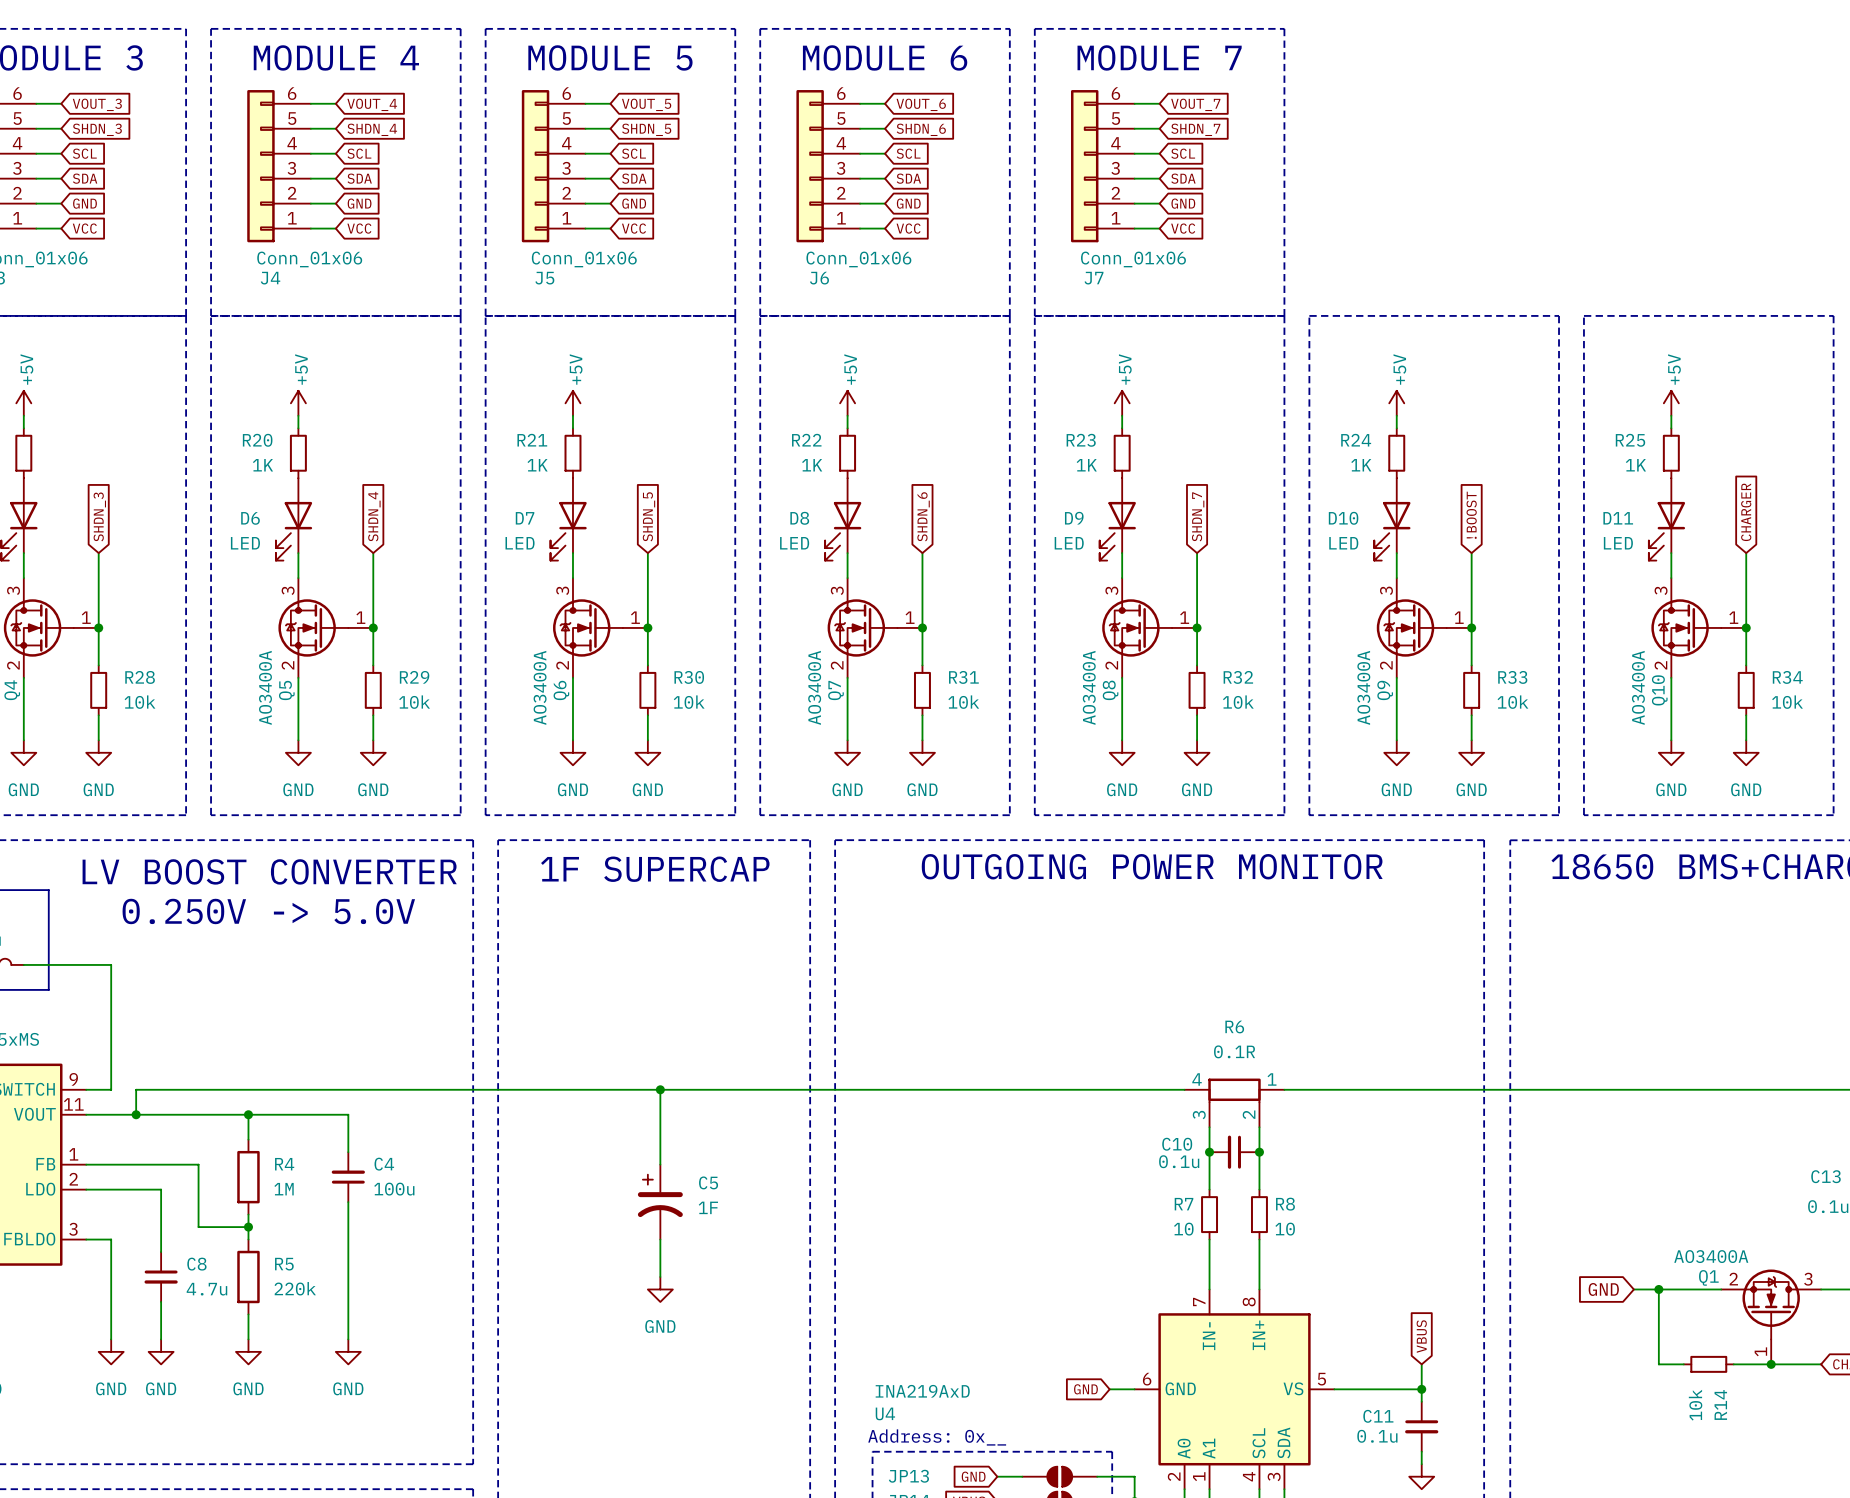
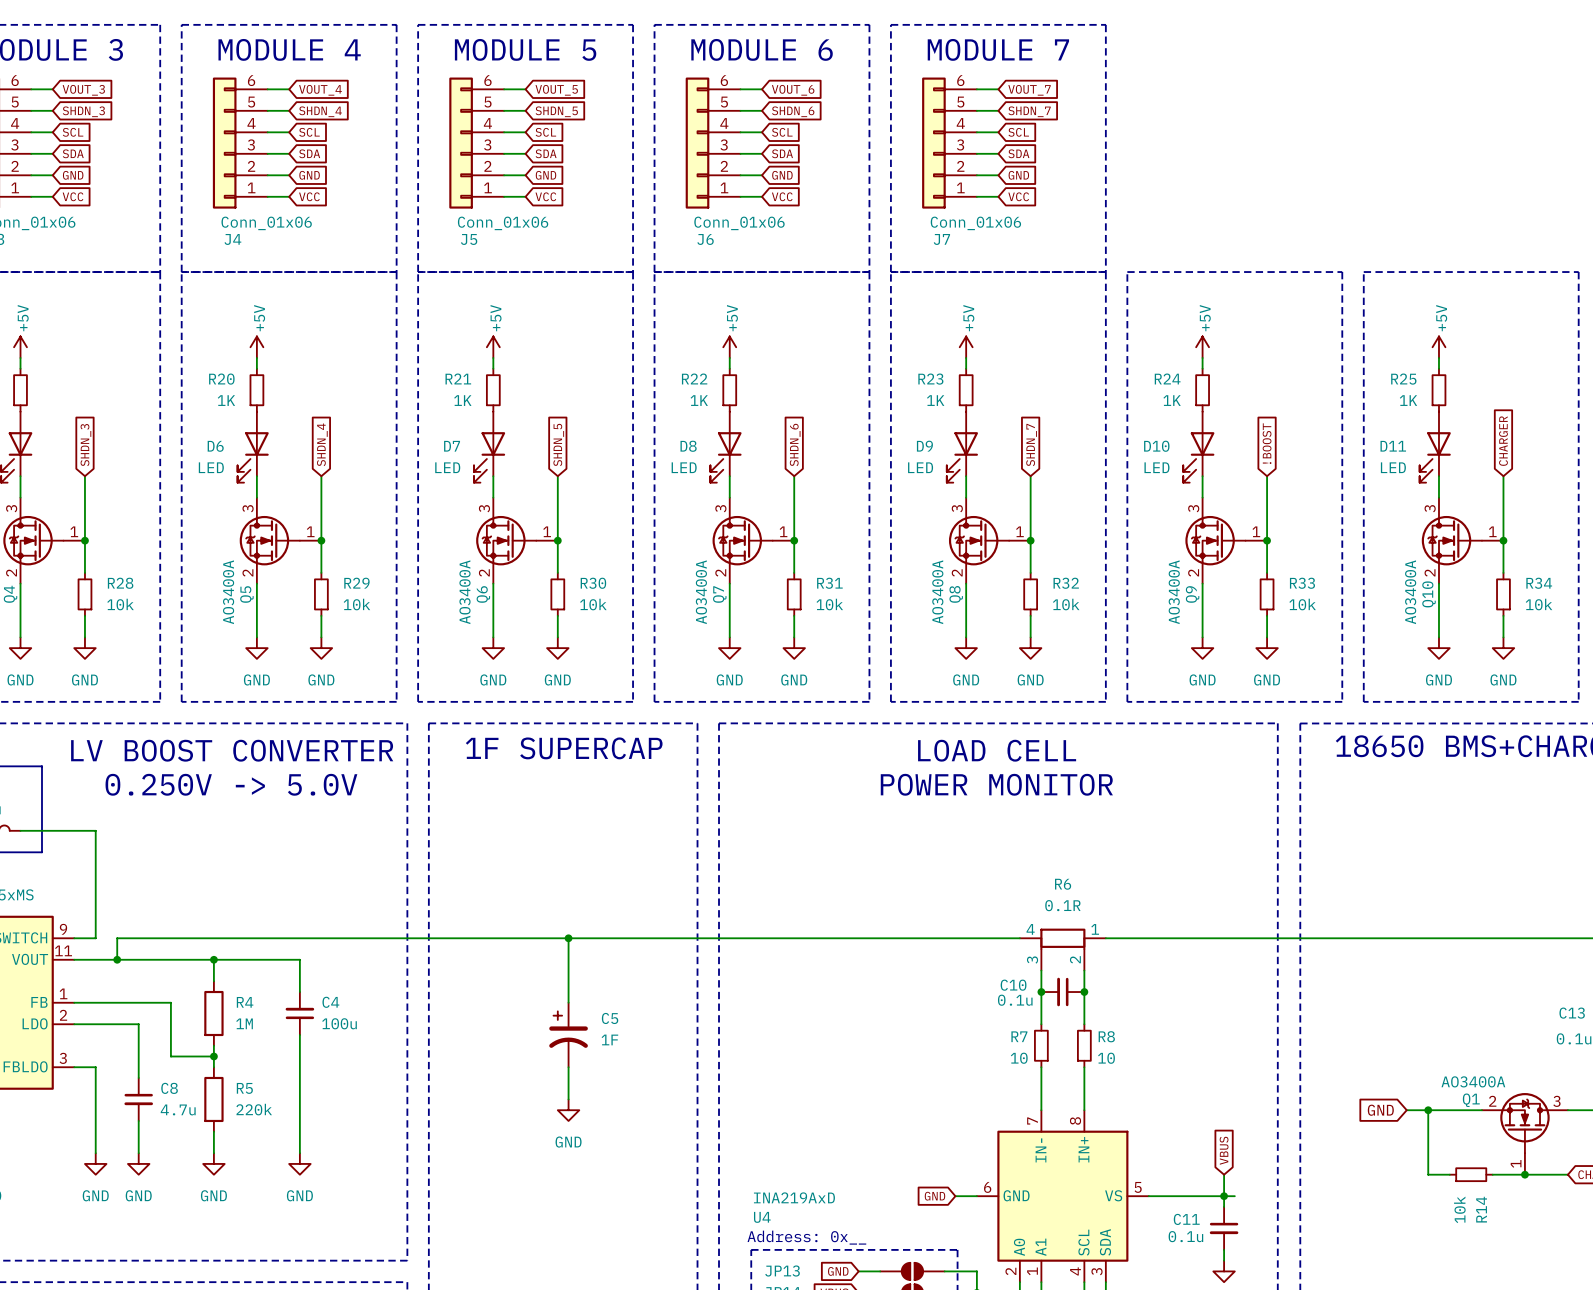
text: OUTGOING POWER MONITOR (1152, 866) -> LOAD CELL (997, 750)
text: none -> POWER MONITOR (996, 784)
wire: none -> (1224, 1196) (1234, 1196)

